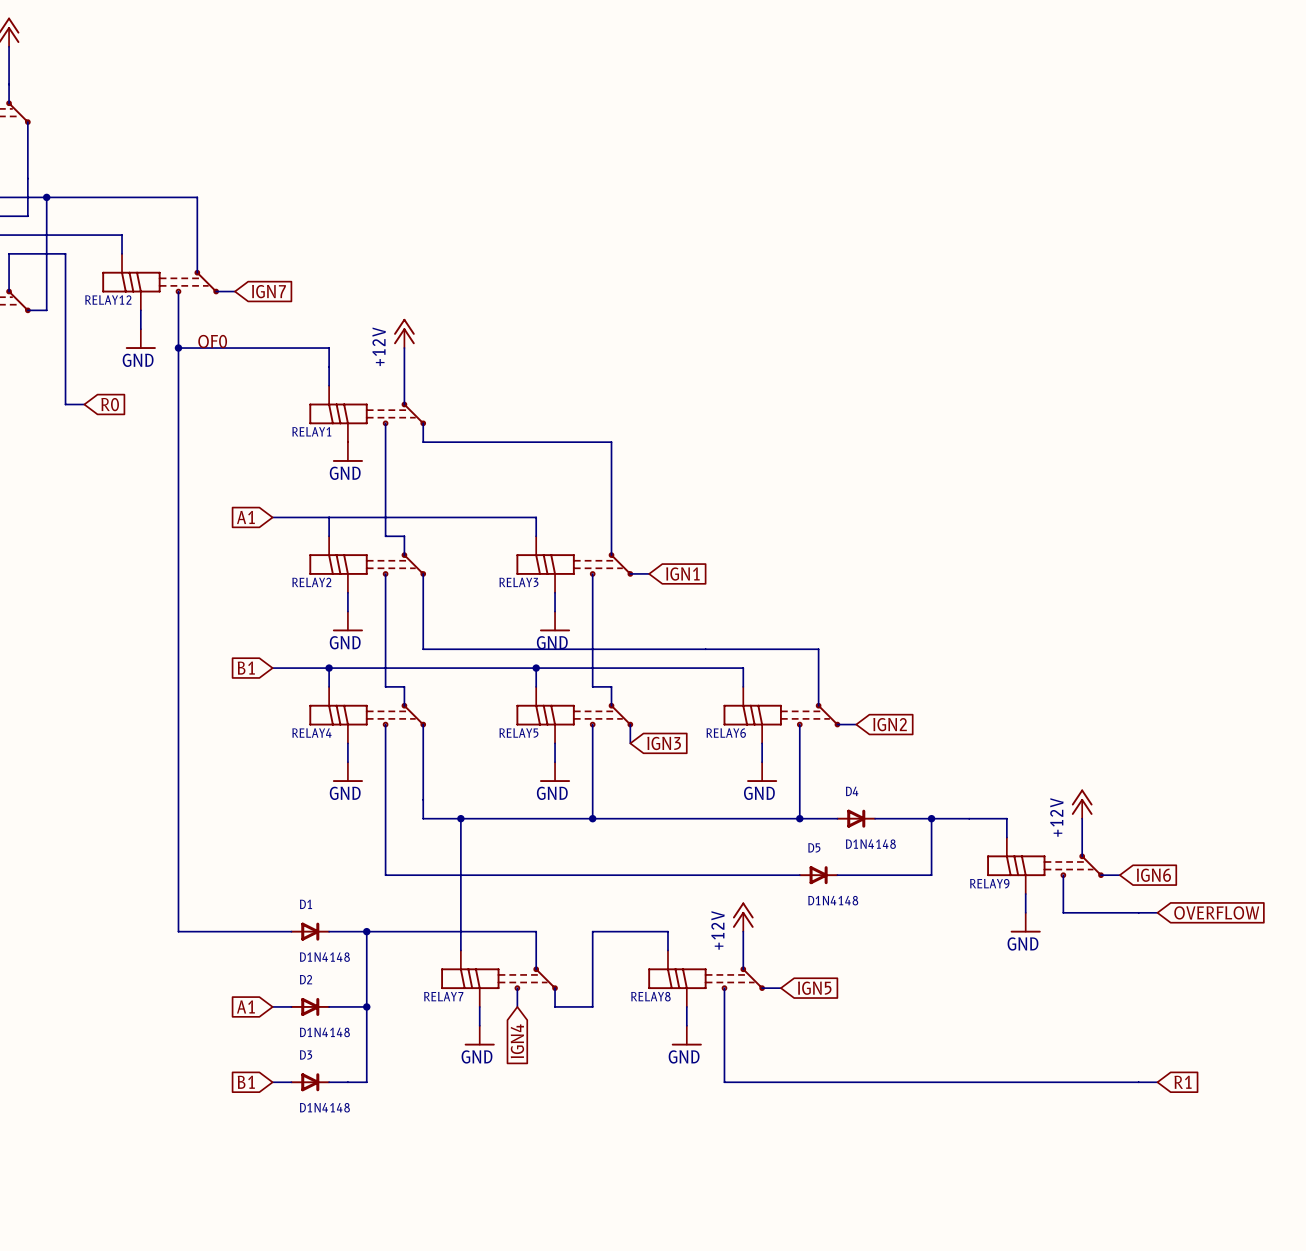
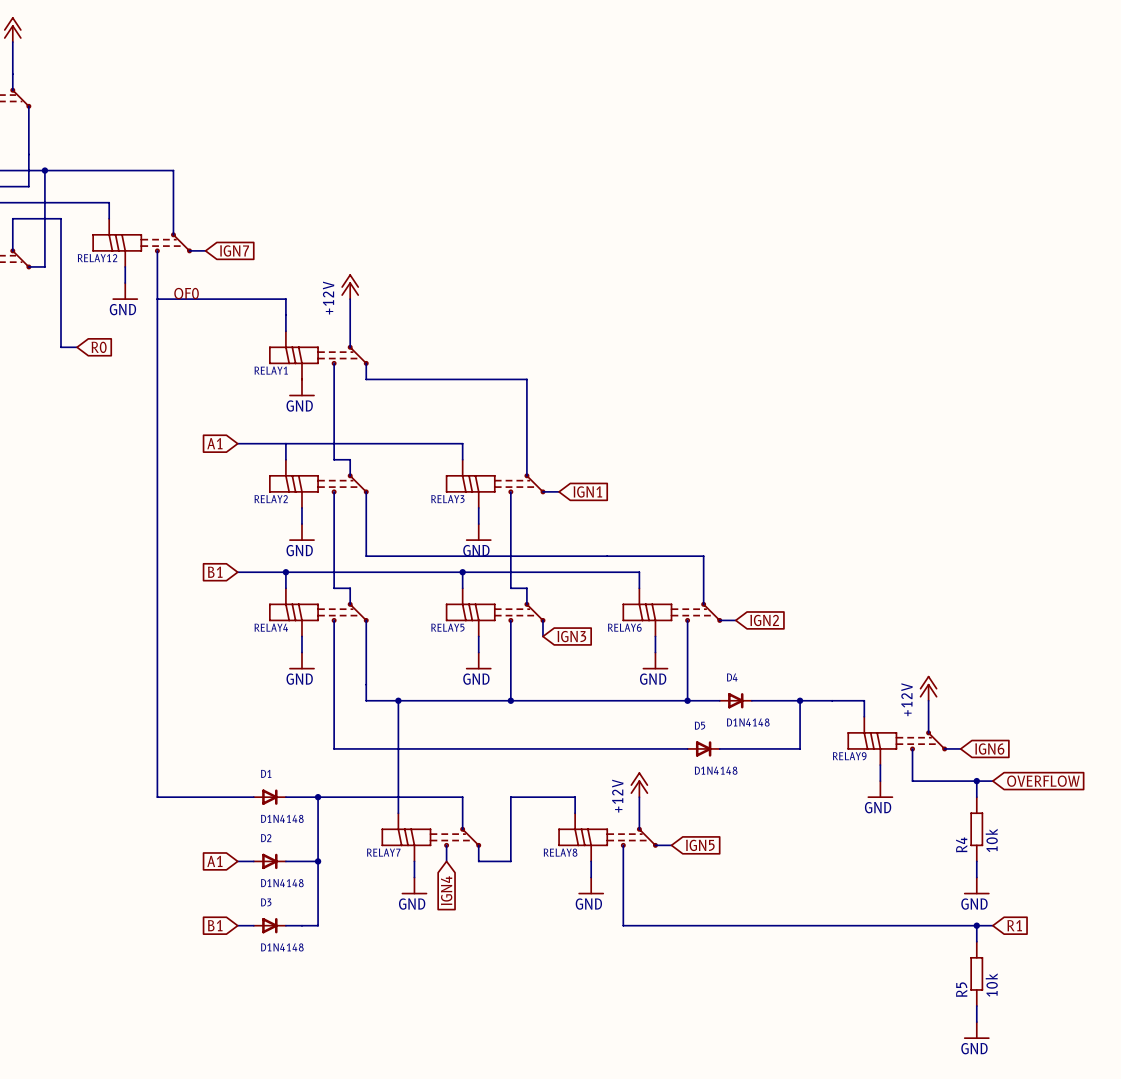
junction: (178, 348) -> none
wire: none -> (976, 781) (976, 797)
junction: none -> (976, 781)
R4: none -> 10k (976, 829)
wire: none -> (976, 861) (976, 877)
power symbol: none -> GND (976, 885)
wire: none -> (976, 925) (976, 941)
junction: none -> (976, 925)
R5: none -> 10k (976, 973)
wire: none -> (976, 1006) (976, 1022)
power symbol: none -> GND (976, 1030)

